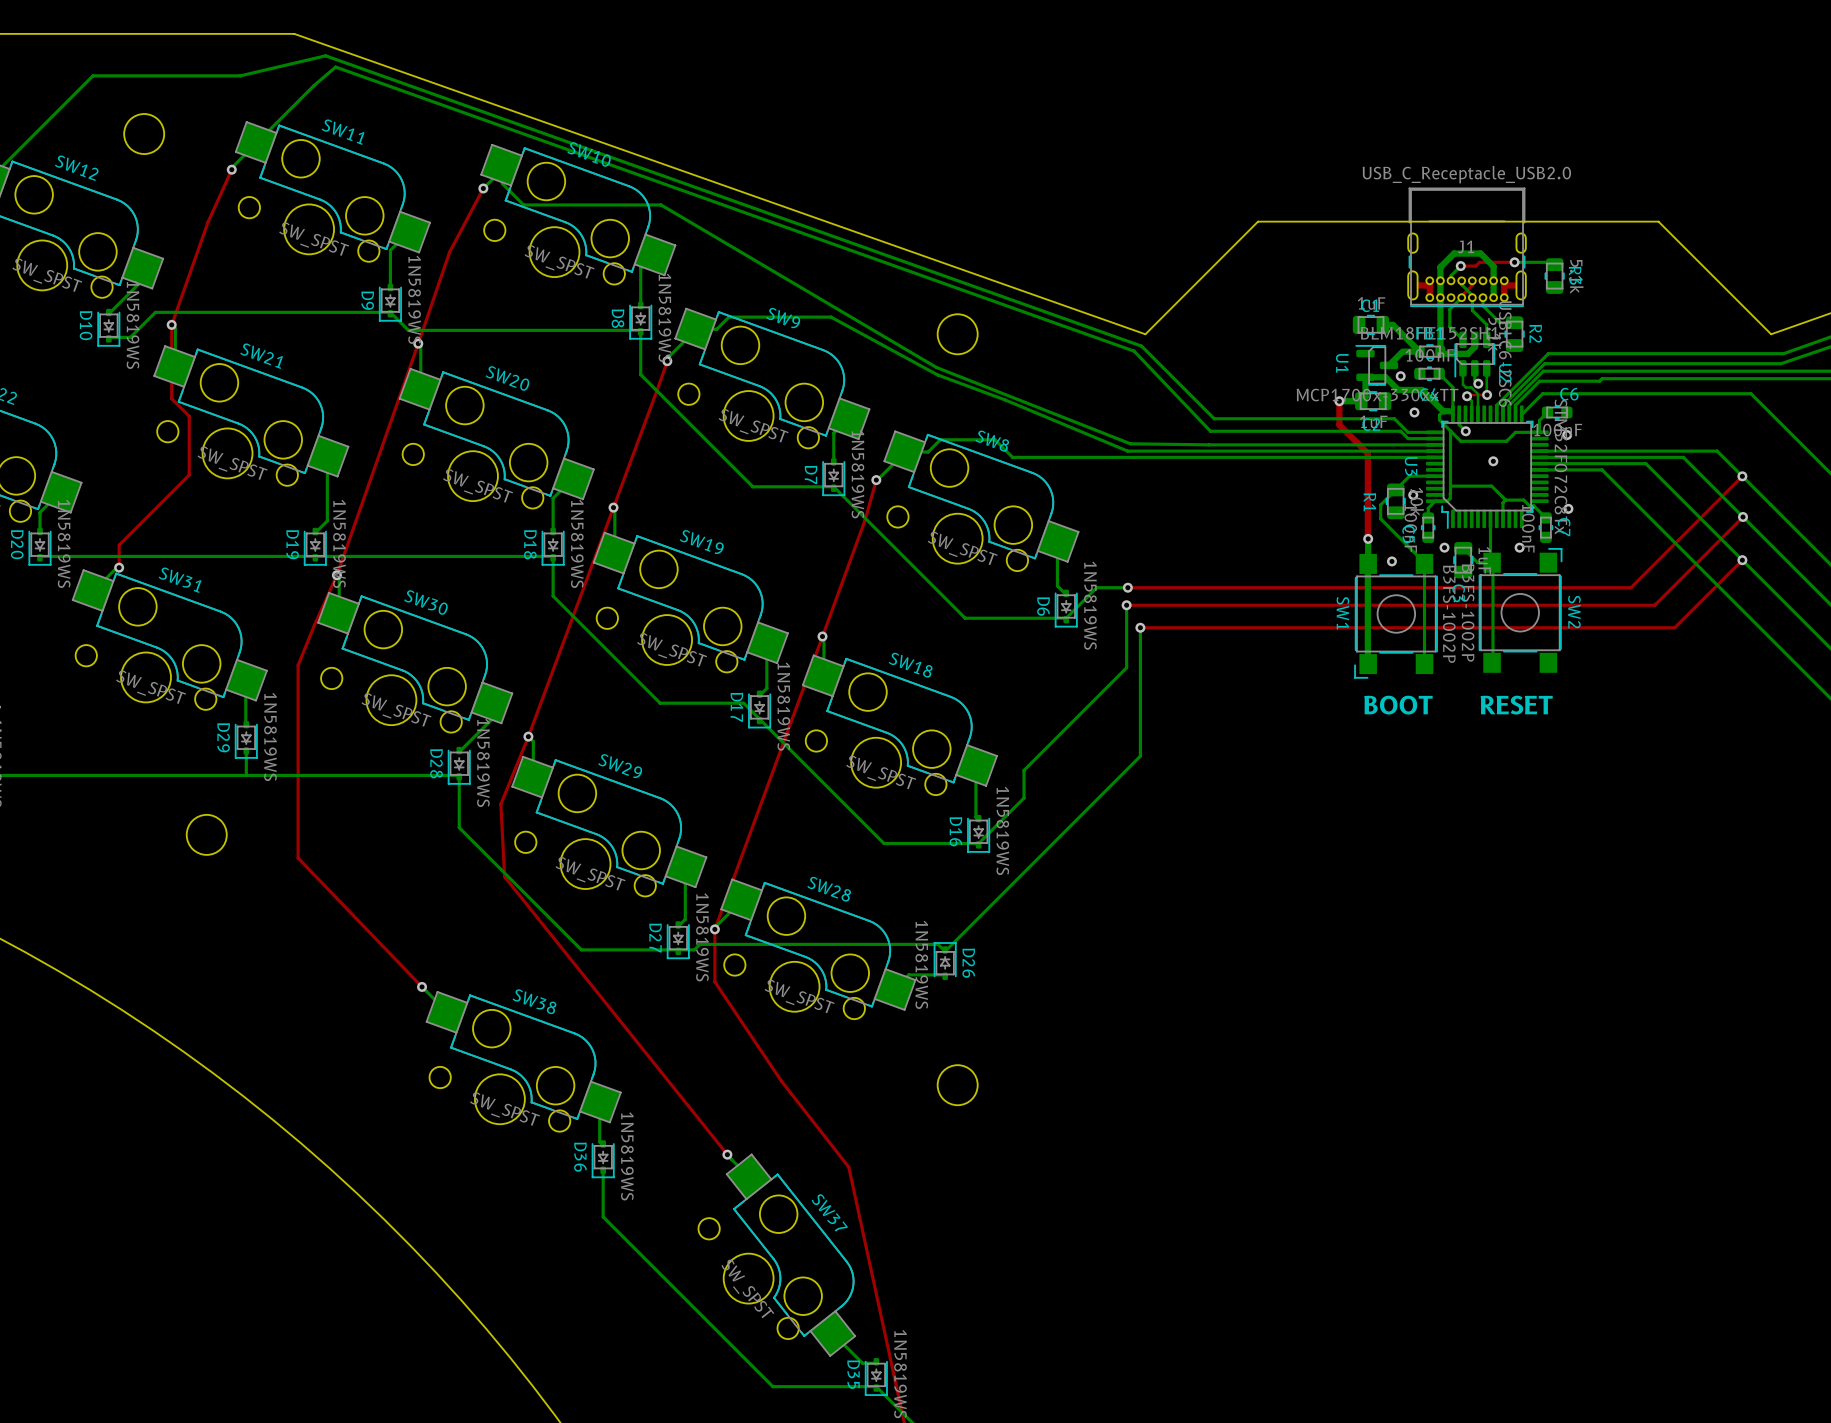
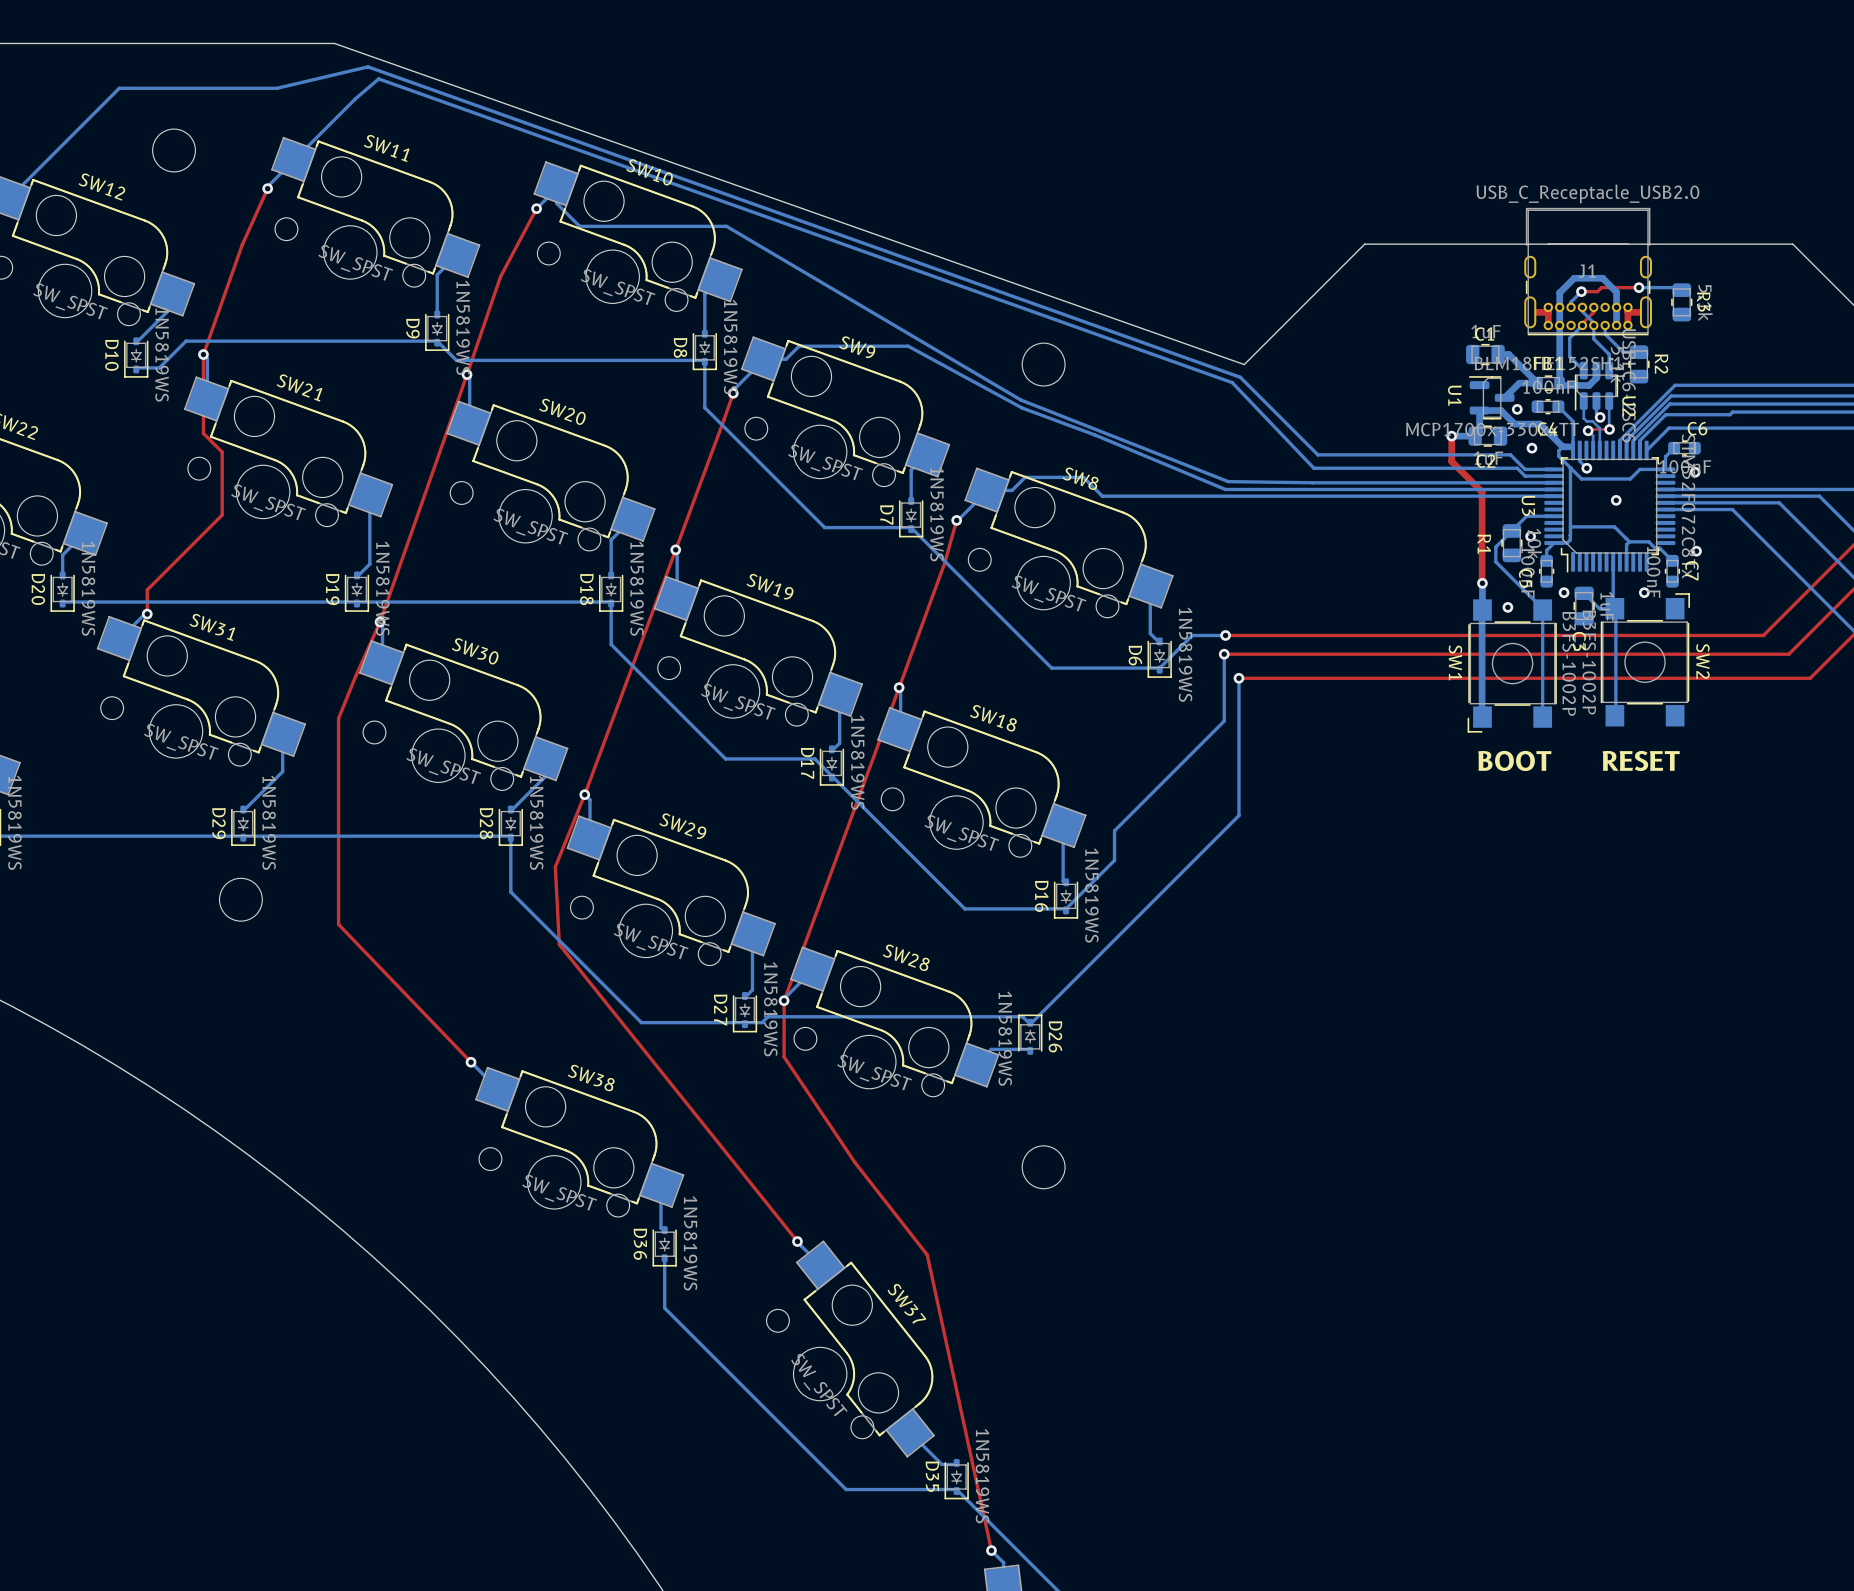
bottom track: (245, 715) (246, 724) -> (282, 771) (243, 811)
D29 position: (246, 739) -> (243, 825)
bottom track: (246, 750) (246, 775) -> none

